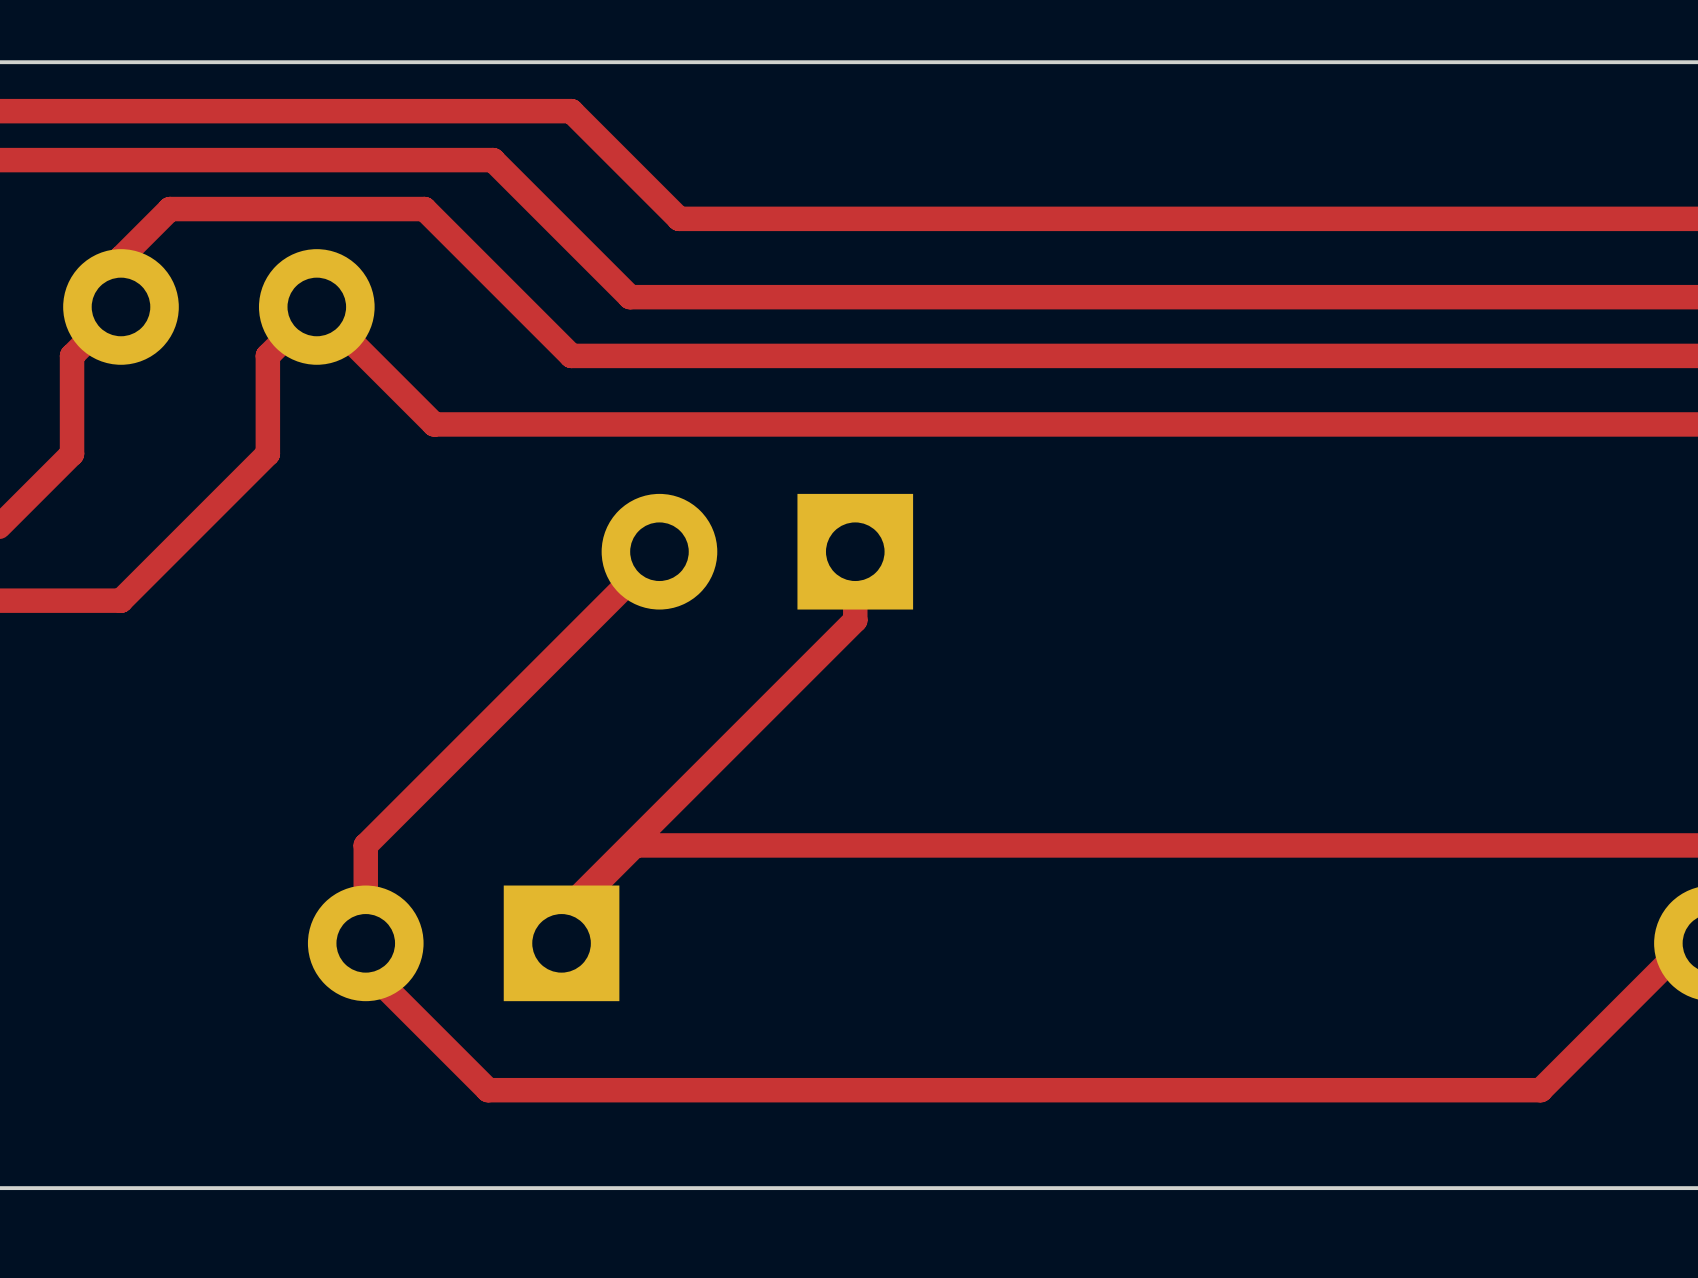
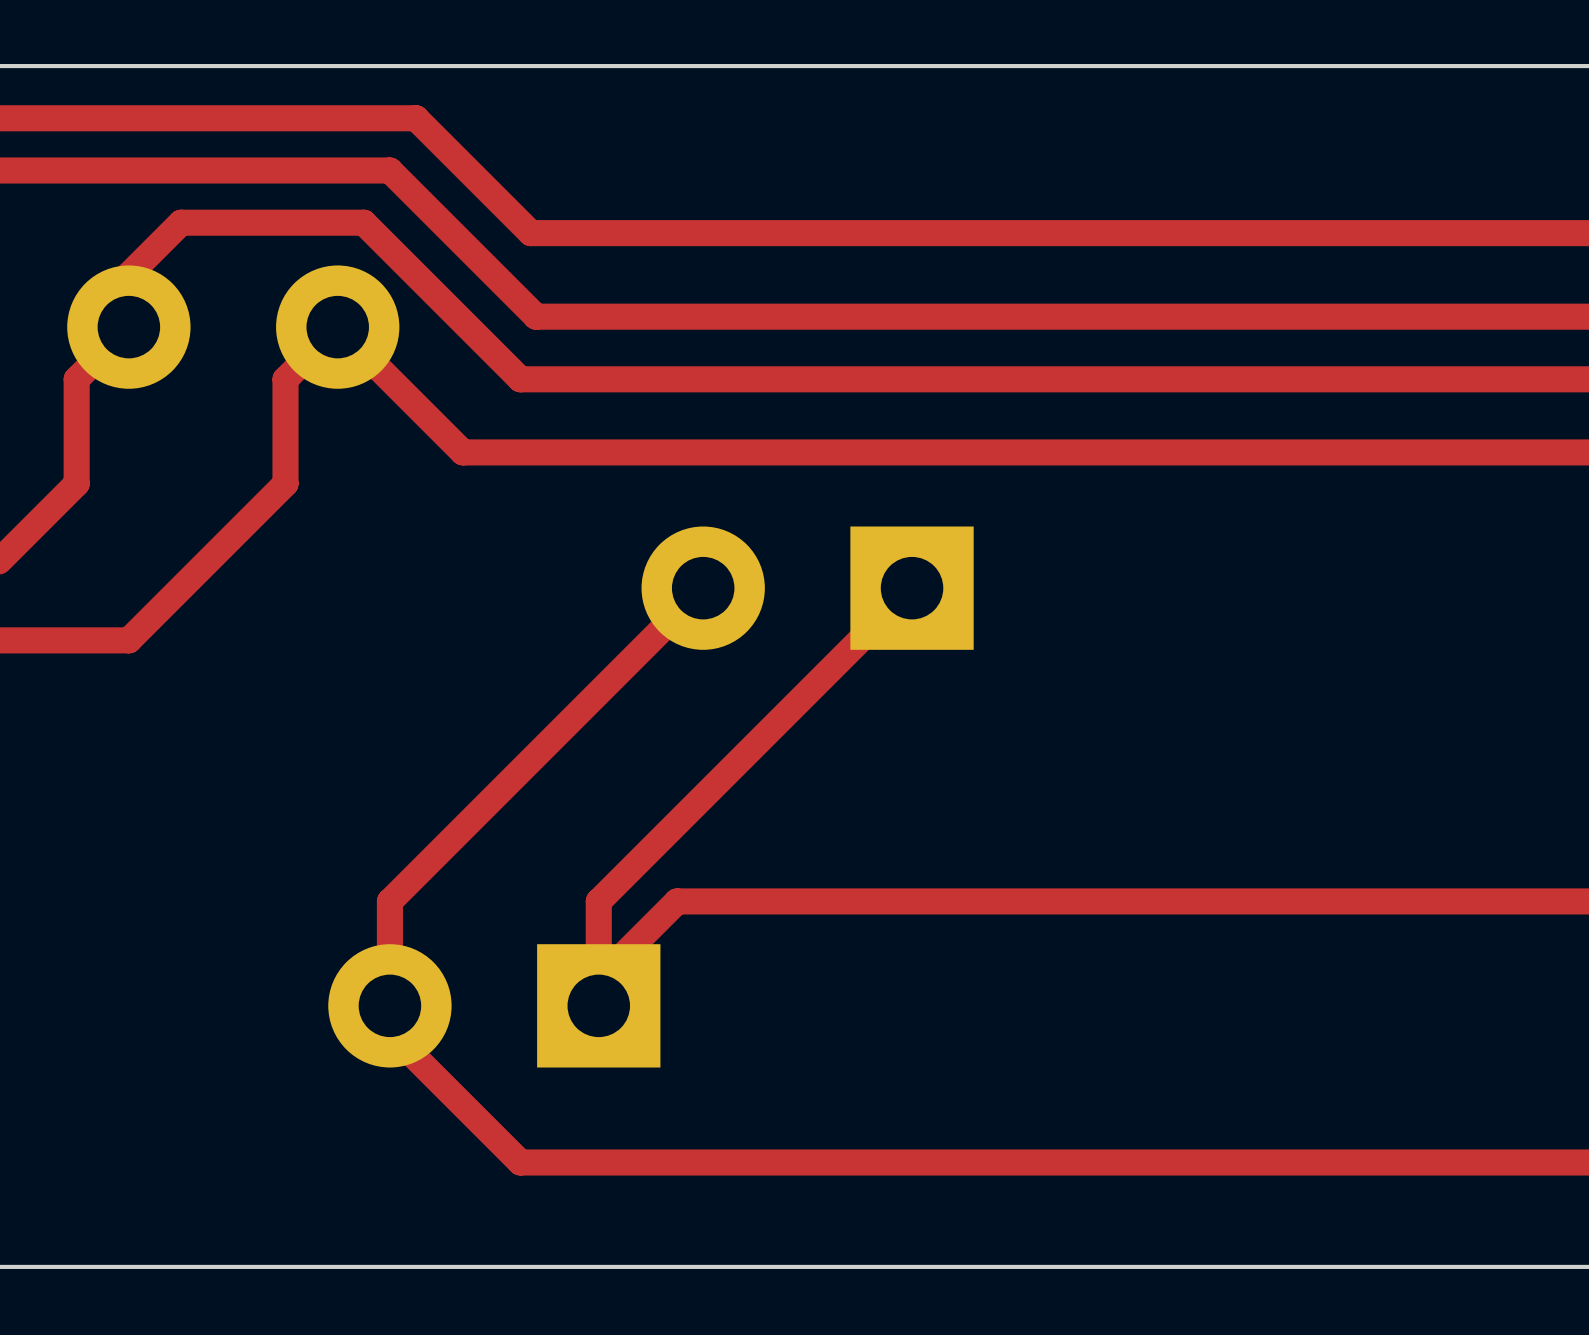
top track: (390, 111) (571, 111) (679, 218) -> (416, 118) (530, 233) (724, 233)
top track: (365, 160) (493, 160) (630, 297) -> (389, 170) (536, 316) (671, 316)
top track: (341, 209) (424, 209) (571, 355) -> (363, 222) (520, 379) (609, 379)
top track: (855, 551) (855, 620) (561, 913) -> (912, 588) (598, 901) (598, 974)

